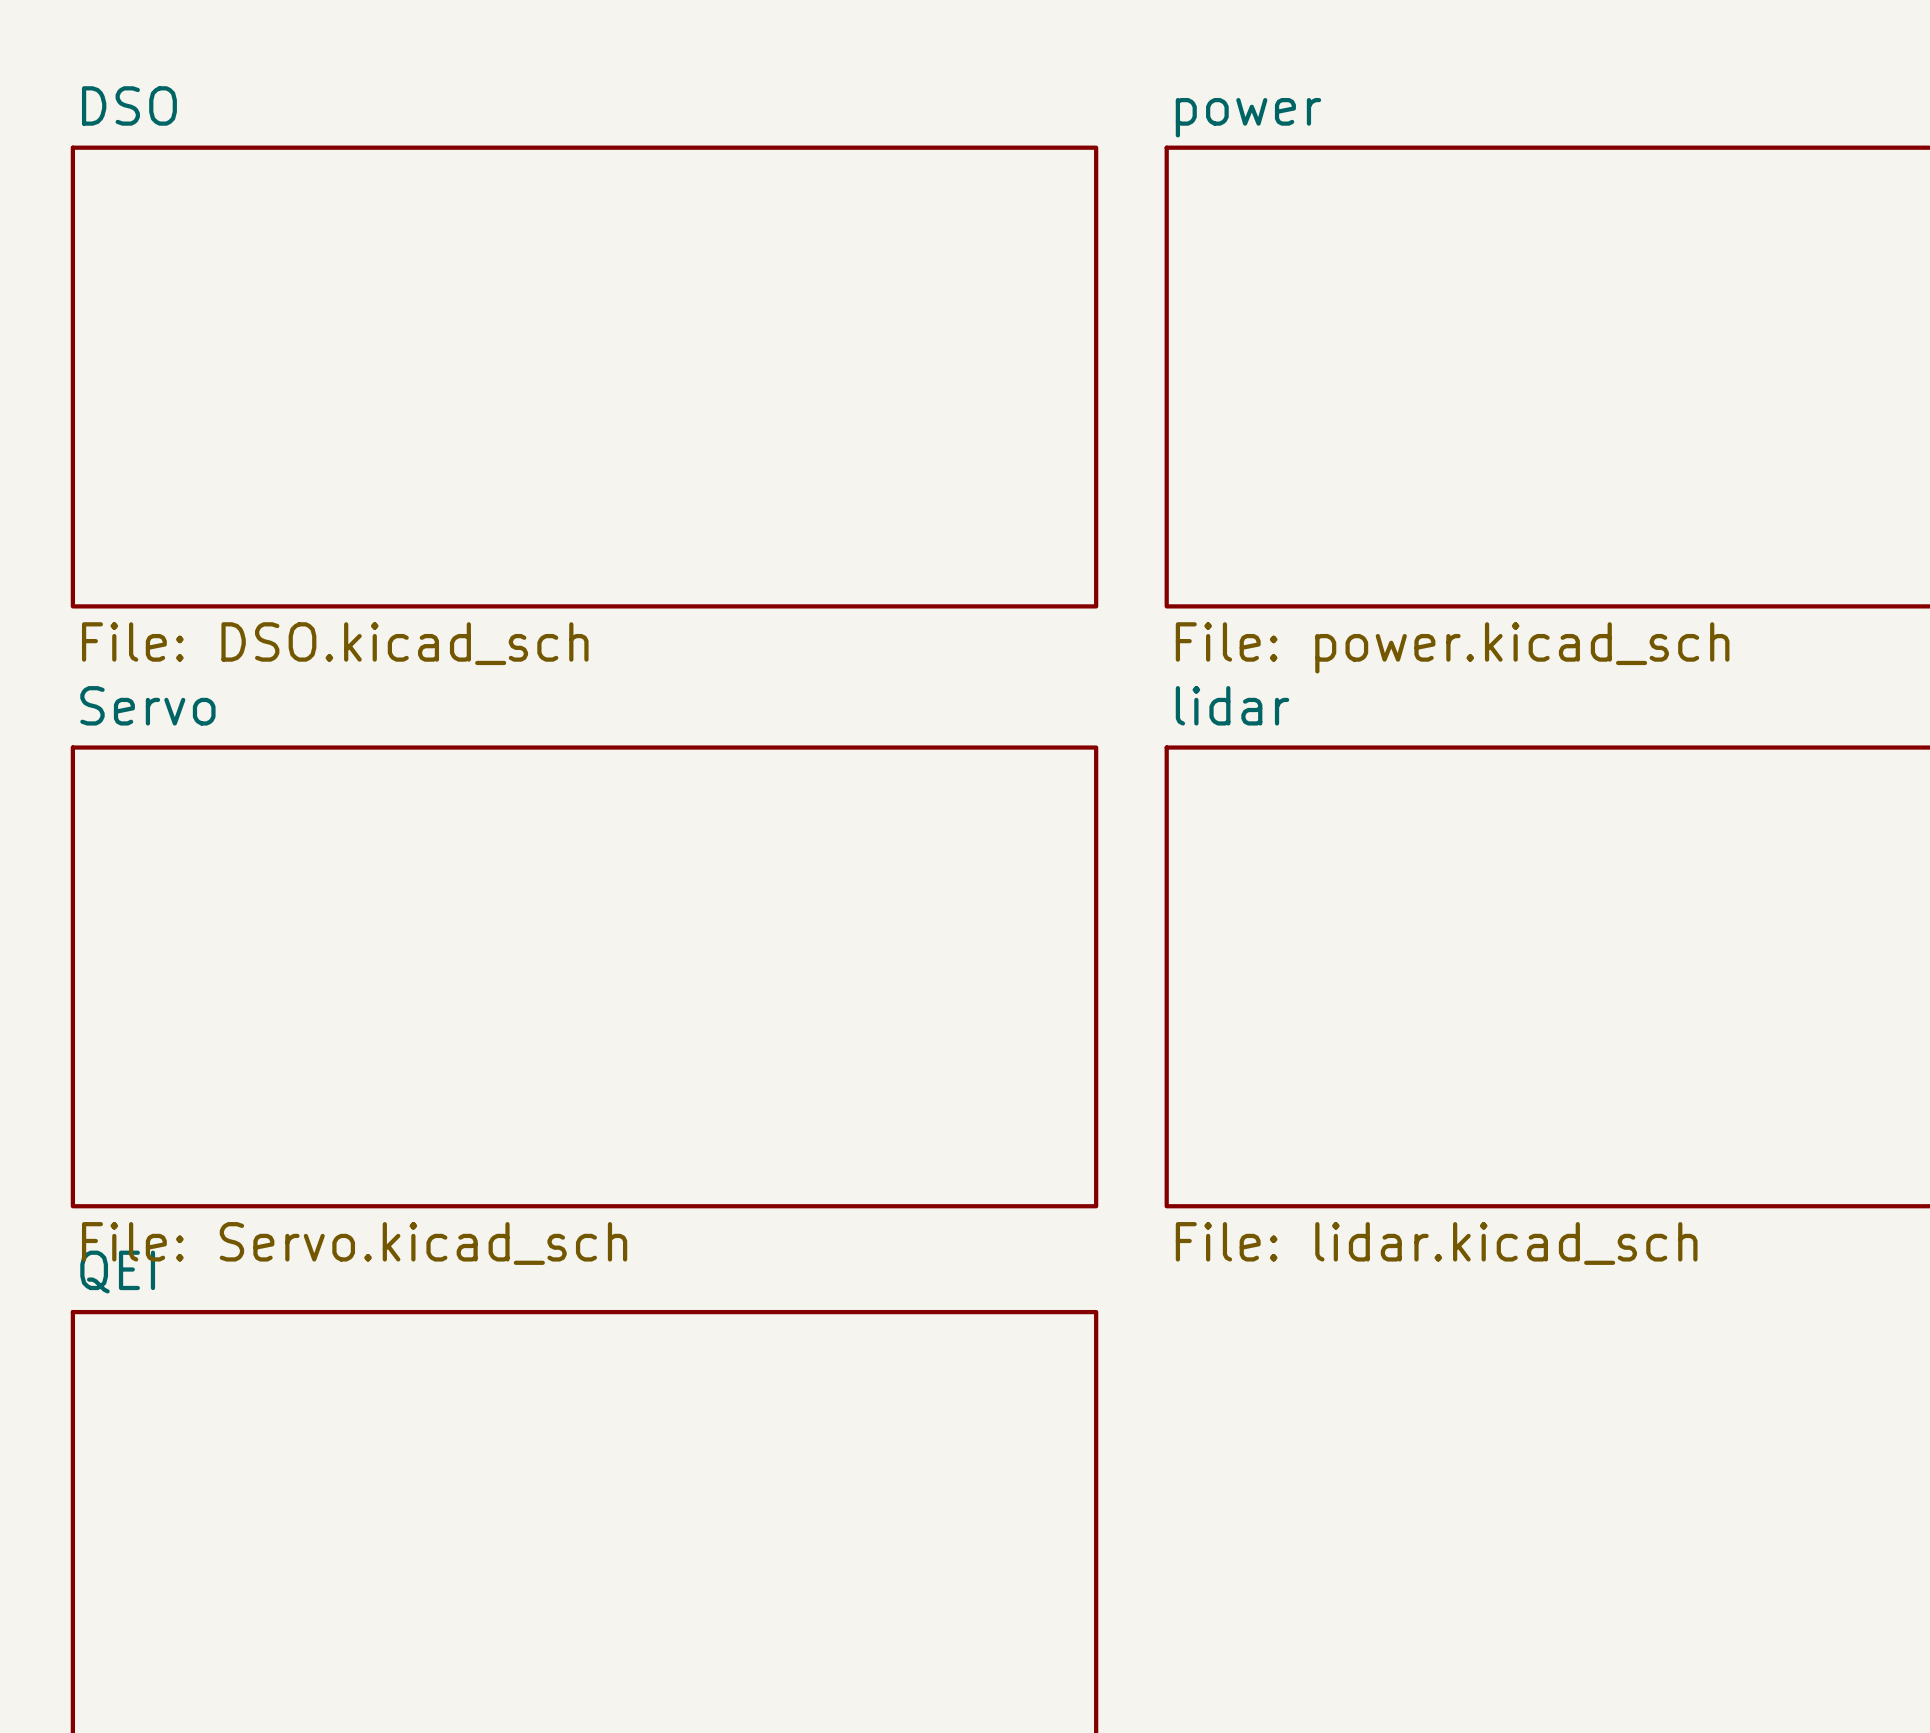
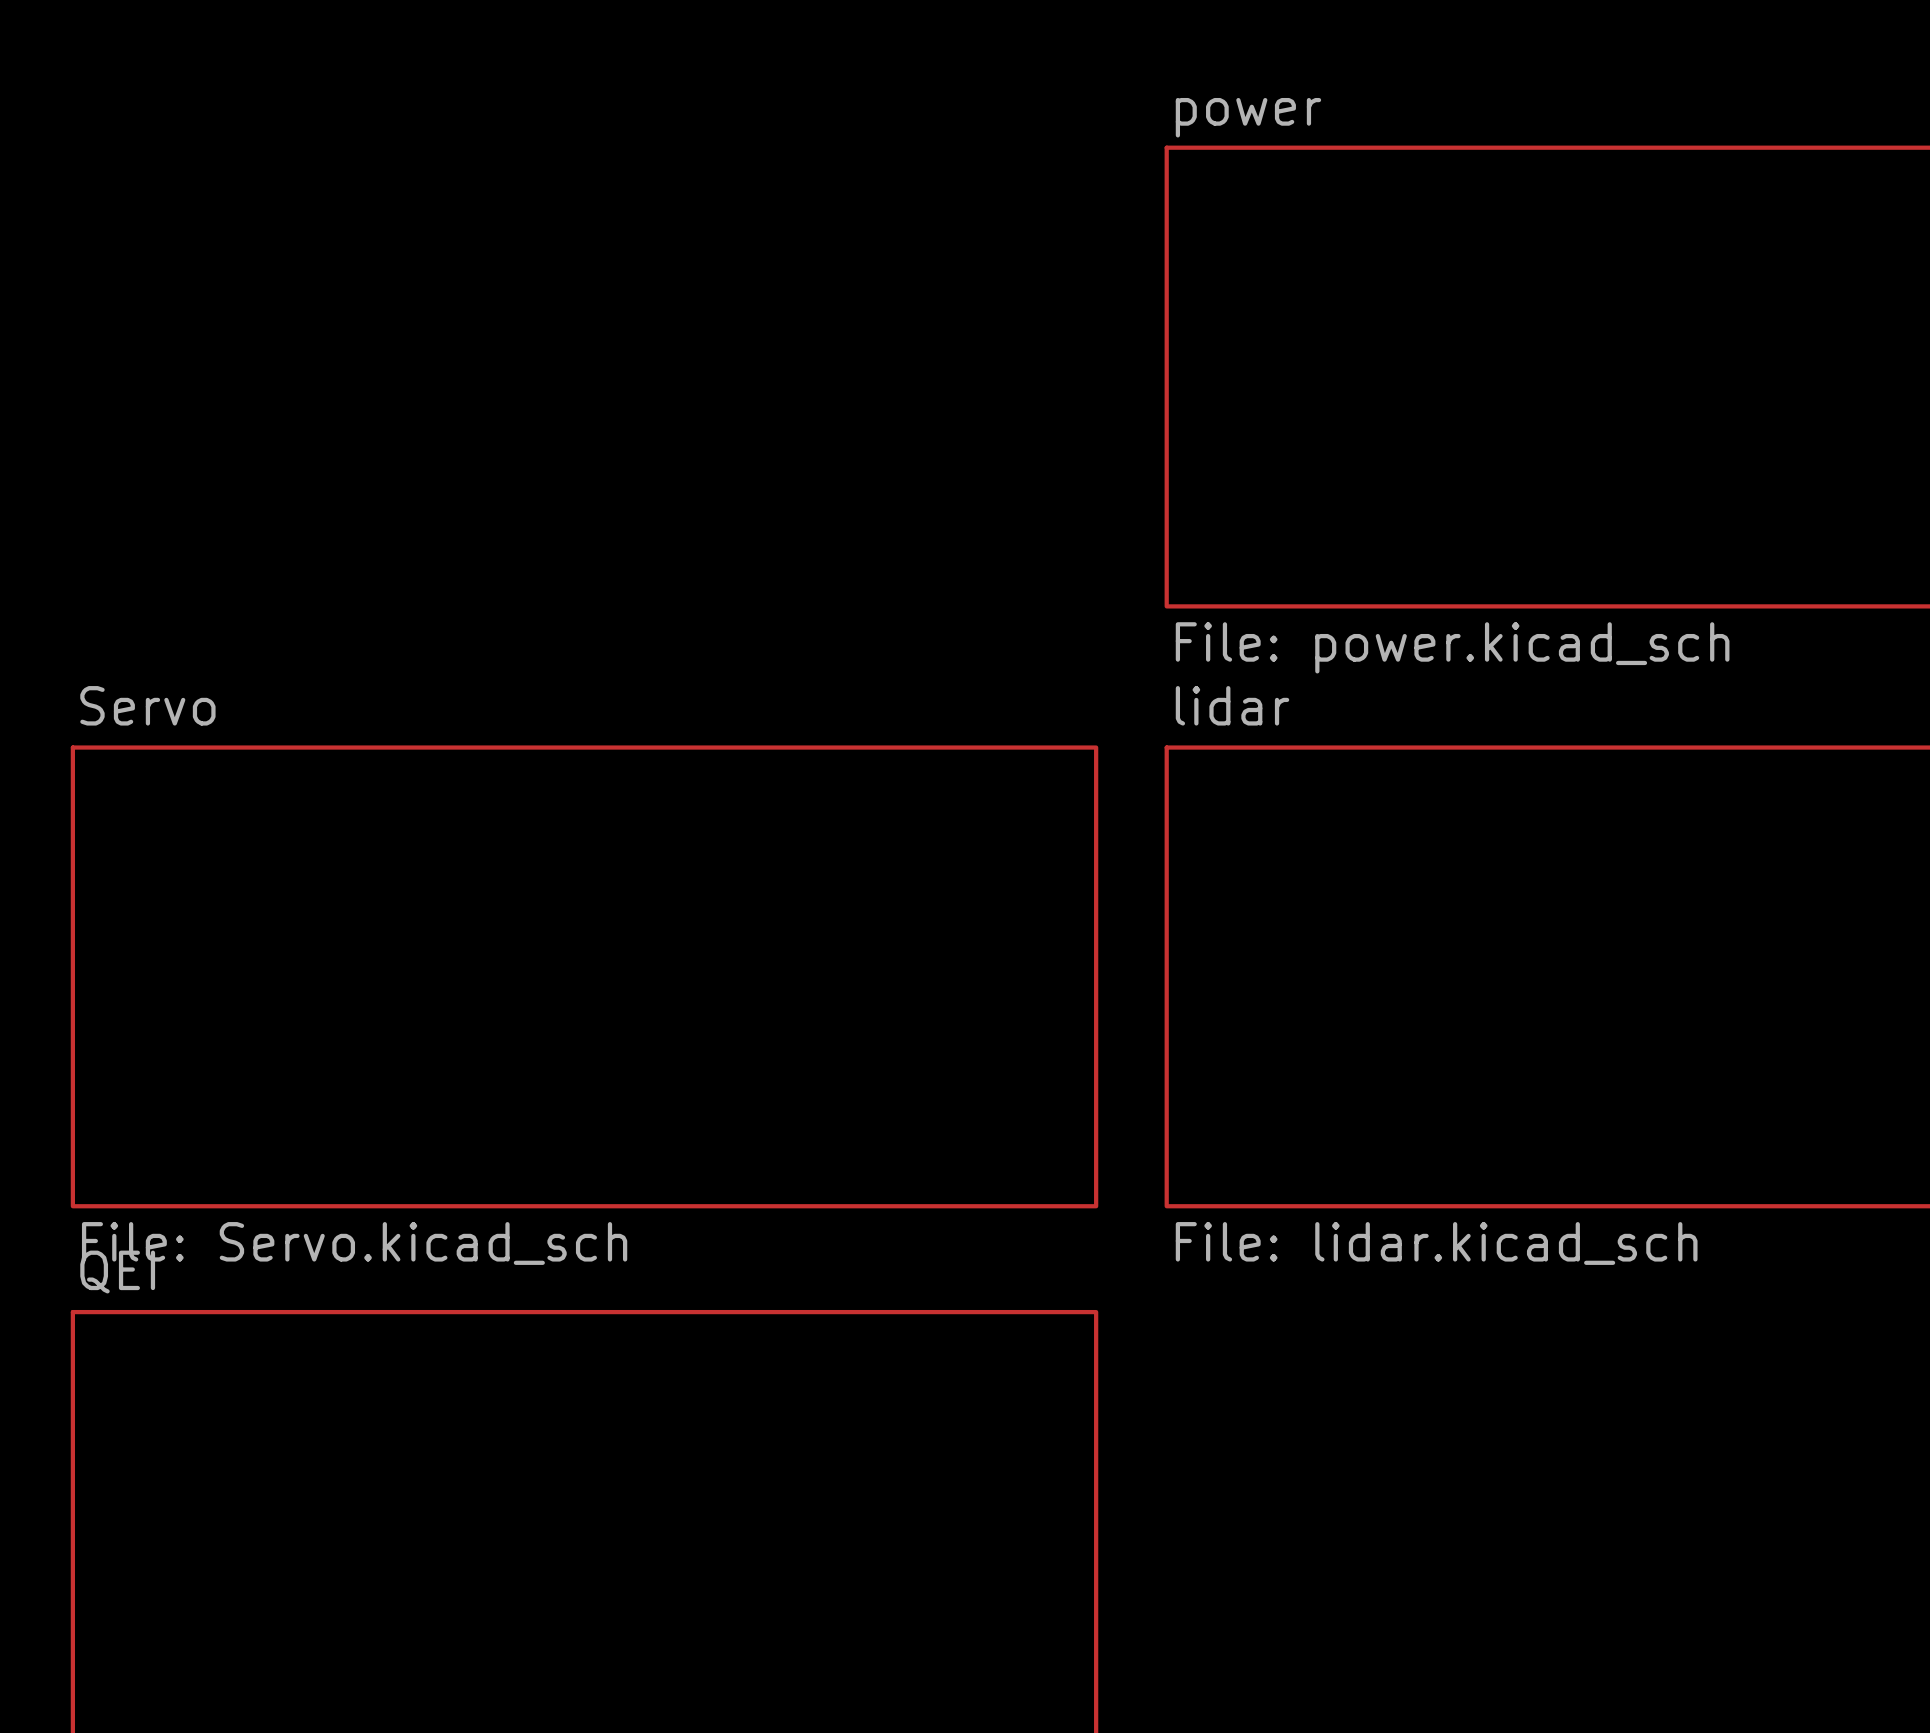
sheet DSO: File: DSO.kicad_sch (584, 377) -> none

